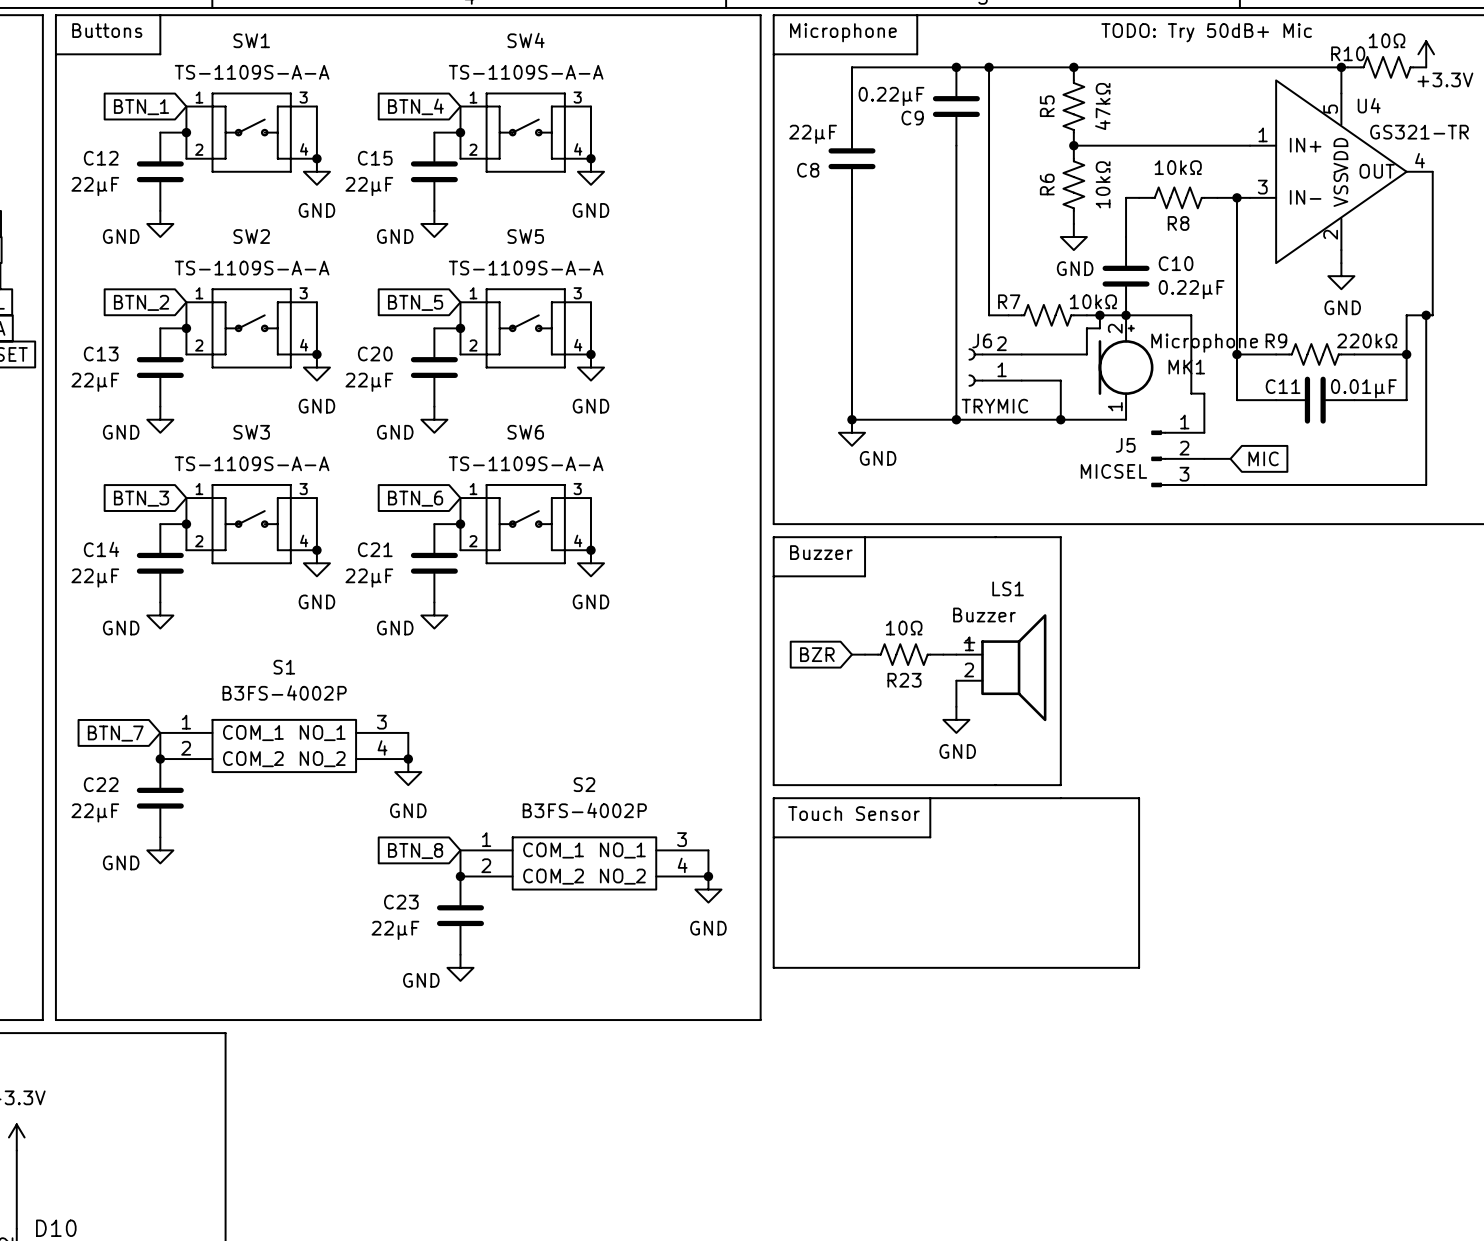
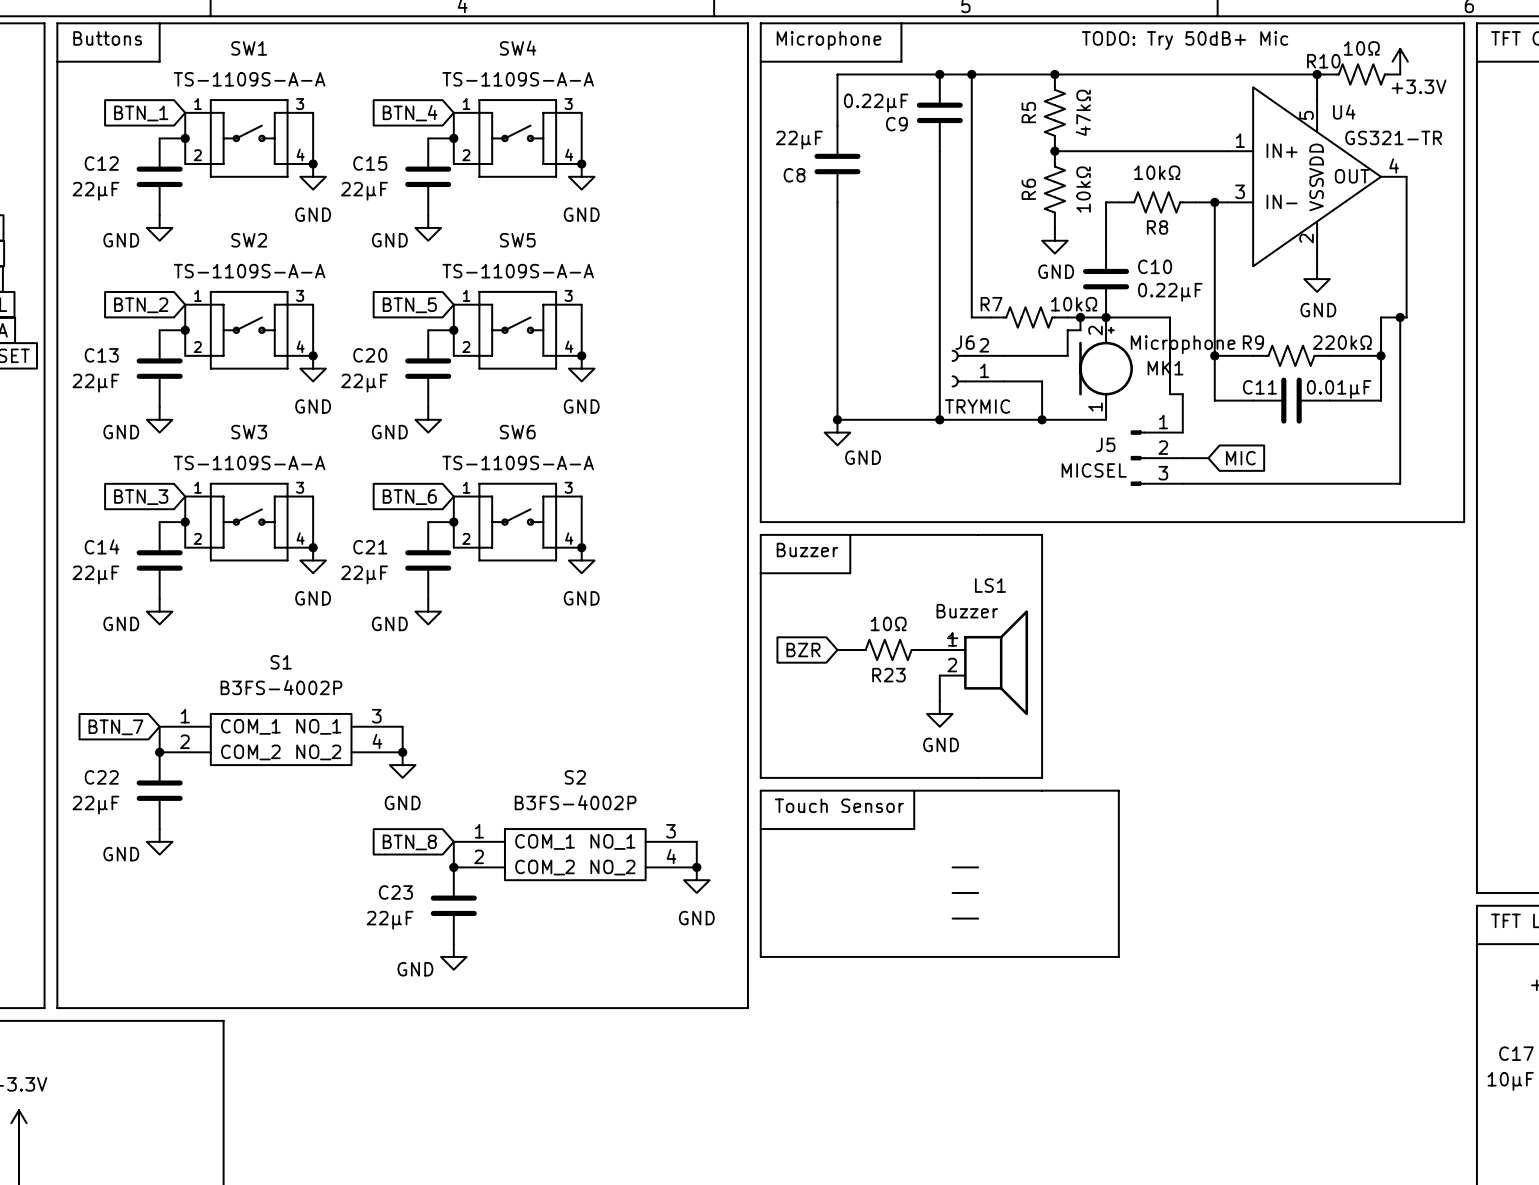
wire: none -> (952, 867) (978, 867)
wire: none -> (952, 892) (978, 892)
wire: none -> (952, 918) (978, 918)

